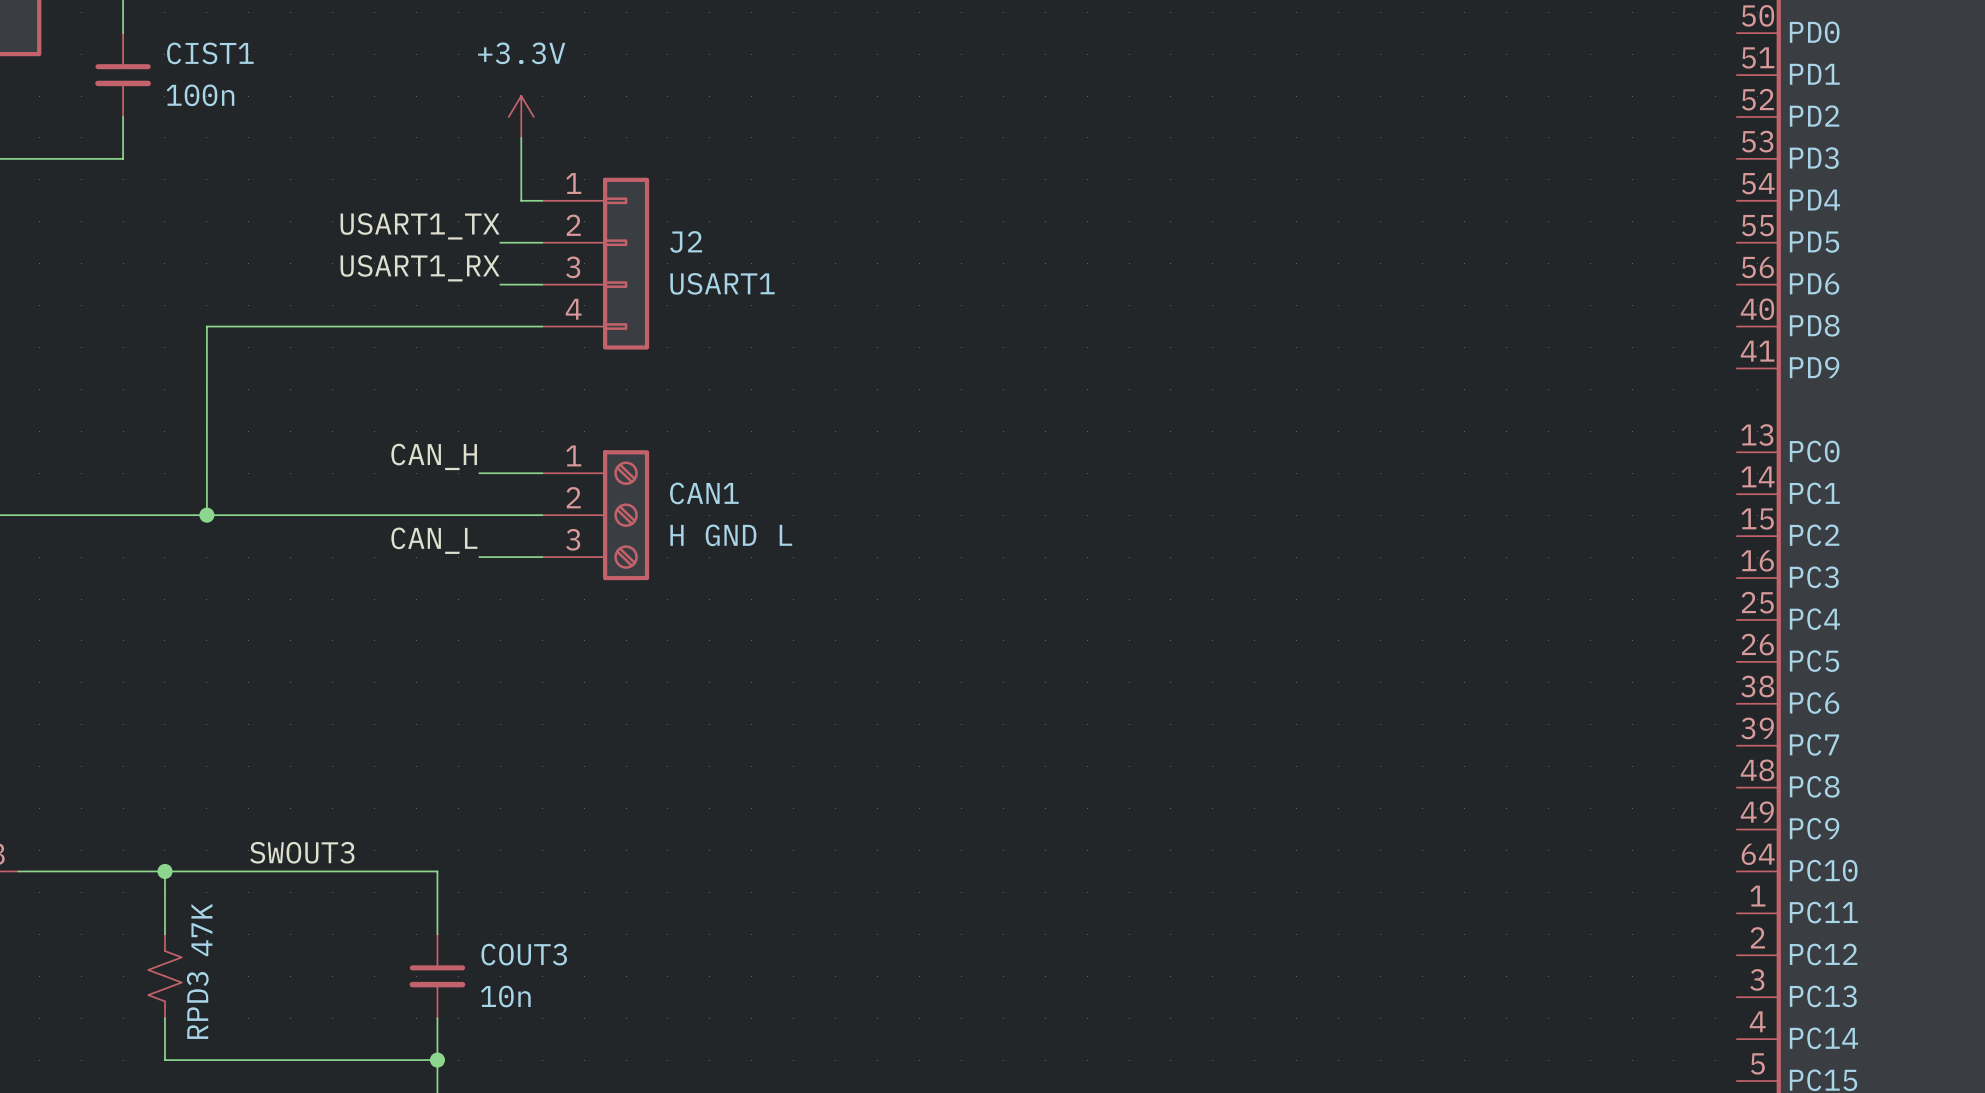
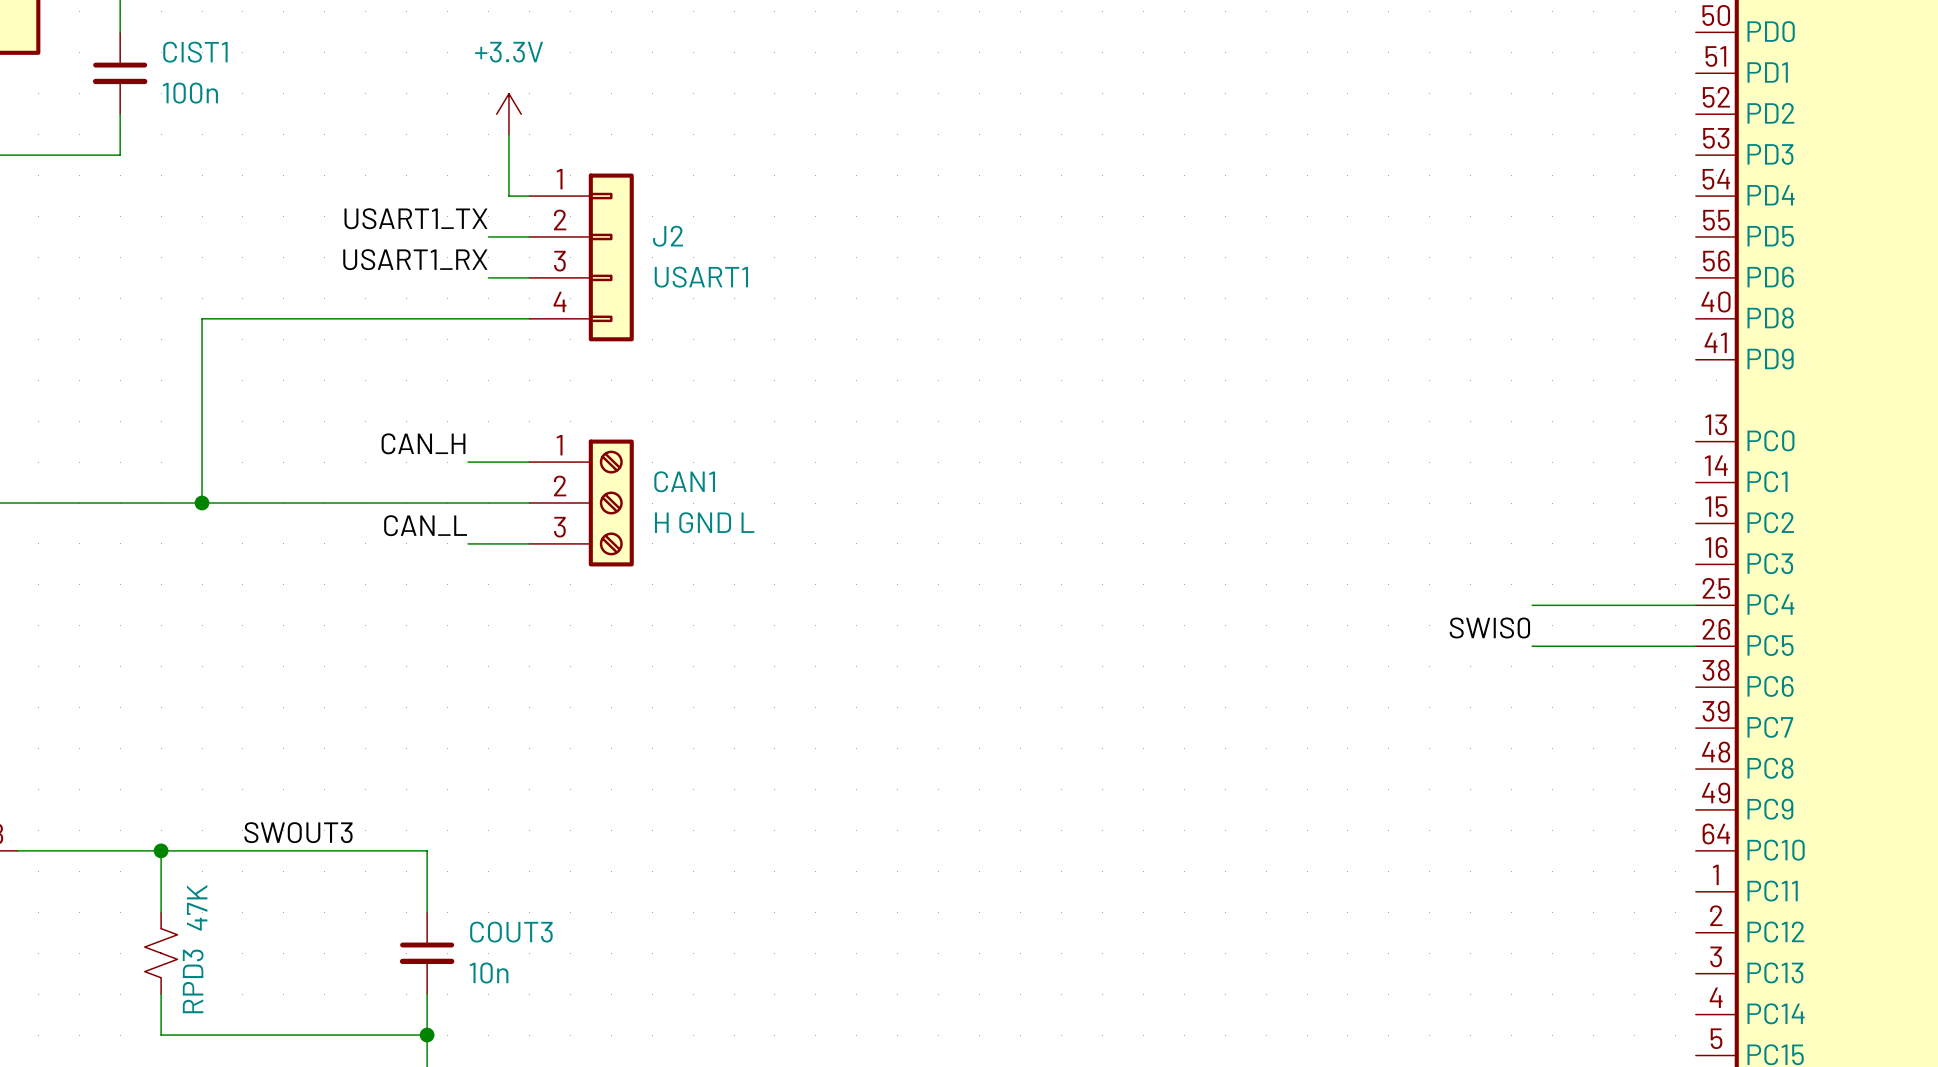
wire: none -> (1532, 605) (1695, 605)
label: none -> SWIS0 (1489, 628)
wire: none -> (1532, 646) (1695, 646)

